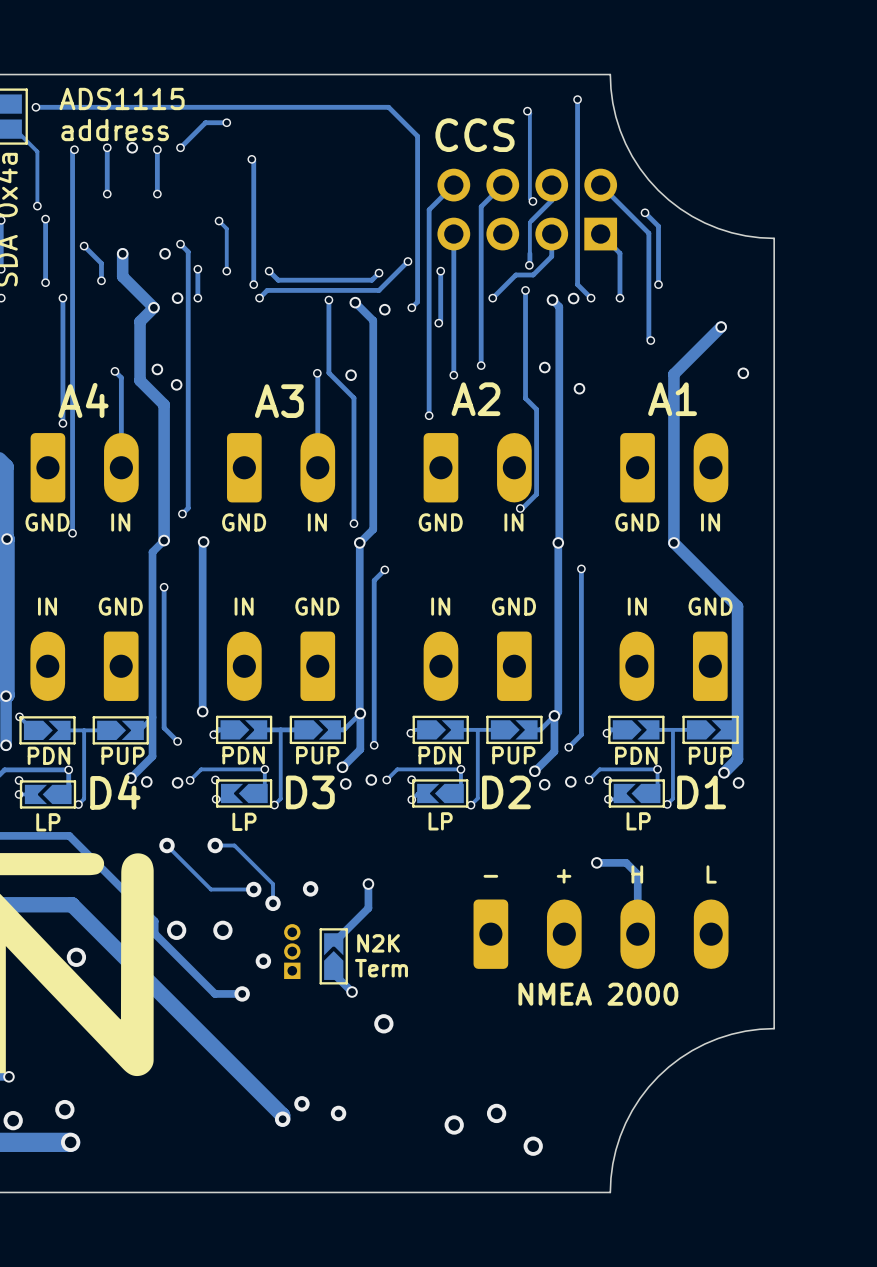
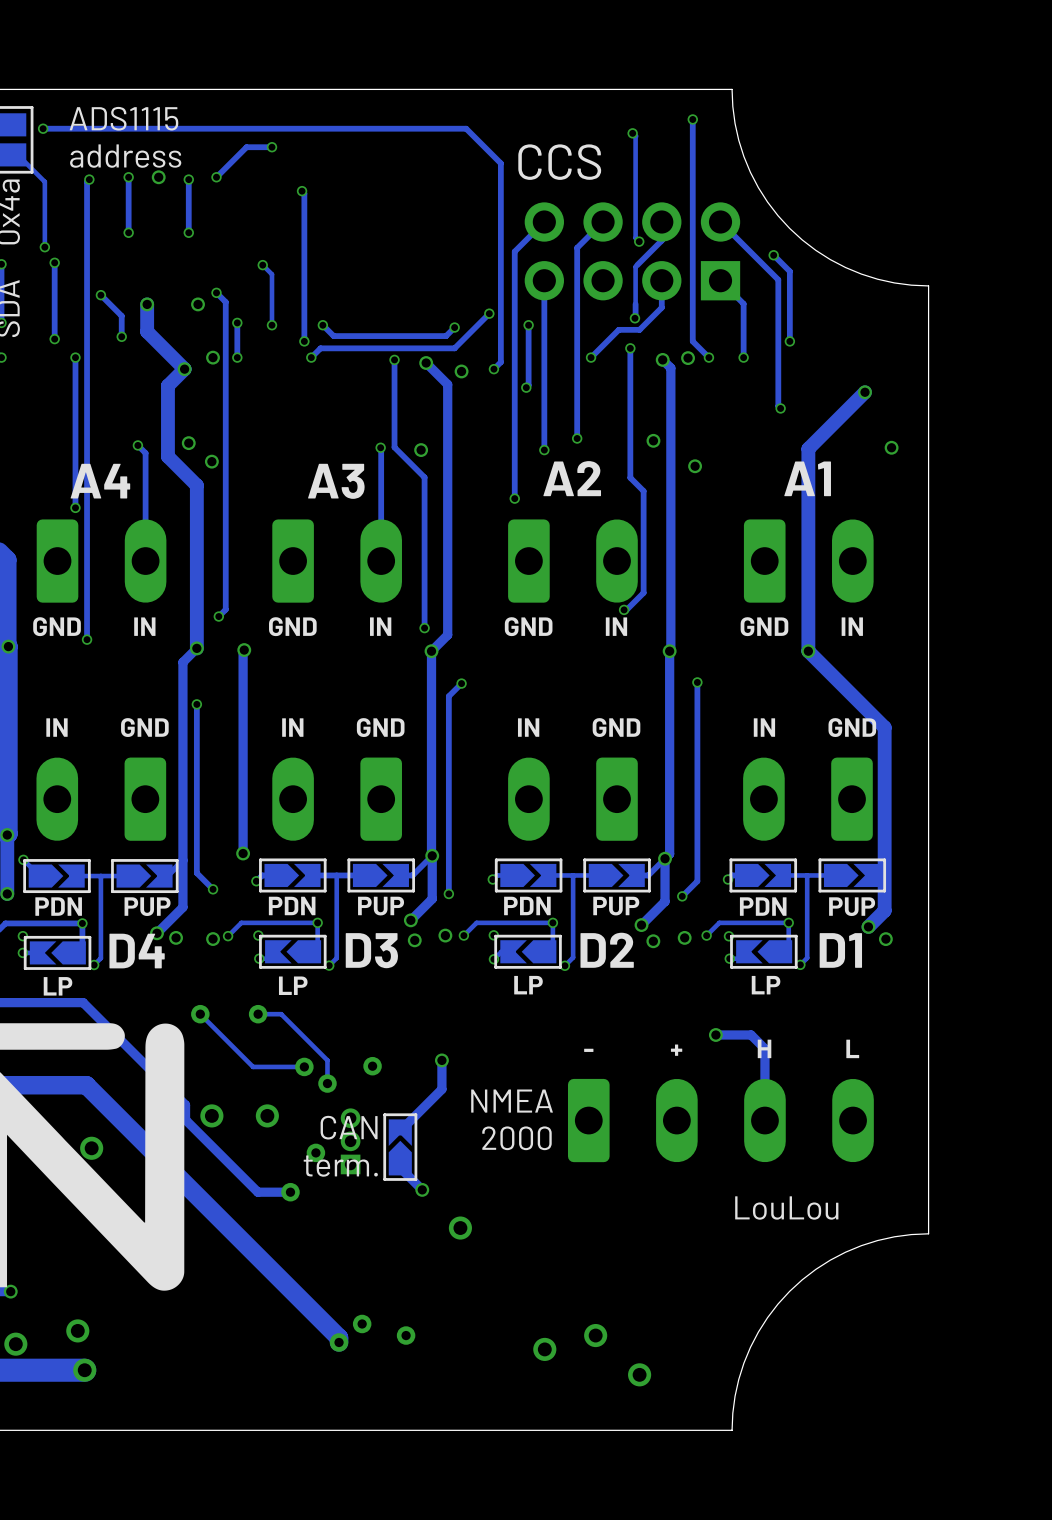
text: none -> NMEA (512, 1101)
text: none -> CAN (349, 1127)
text: N2K (378, 943) -> none
text: none -> 2000 (516, 1138)
text: Term (381, 968) -> none
text: none -> term. (340, 1166)
text: NMEA 2000 (598, 994) -> none
text: none -> LouLou (786, 1208)

